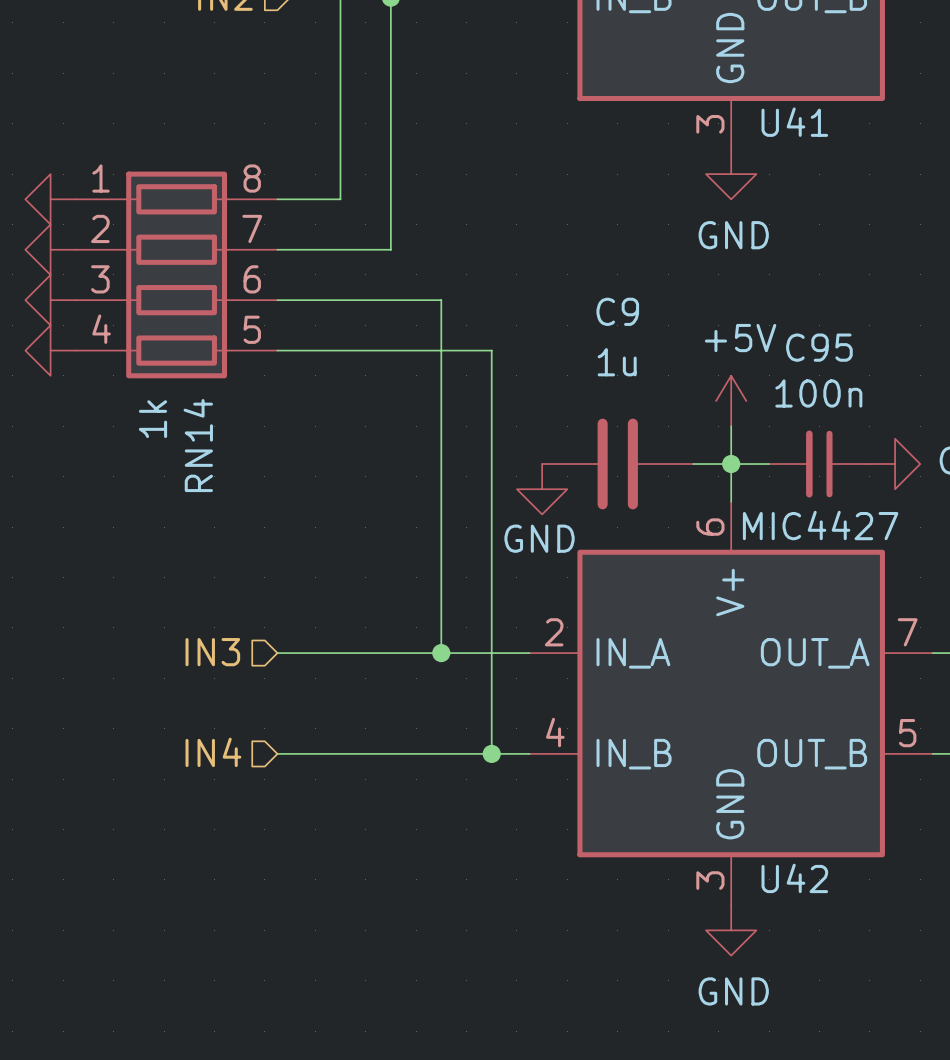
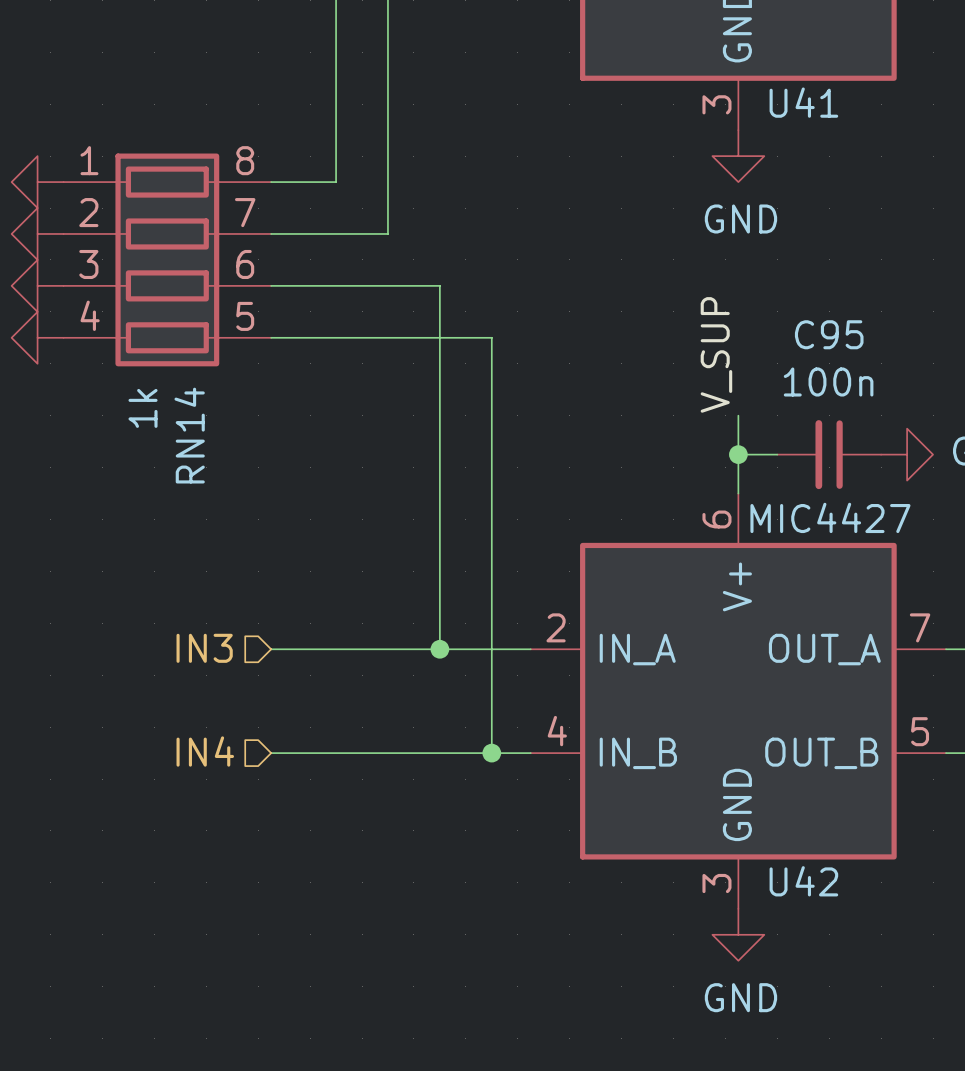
label: none -> V_SUP (716, 354)
power symbol: +5V (731, 400) -> none
C9: 1u (617, 464) -> none
wire: (693, 464) (731, 464) -> none
power symbol: GND (542, 489) -> none

